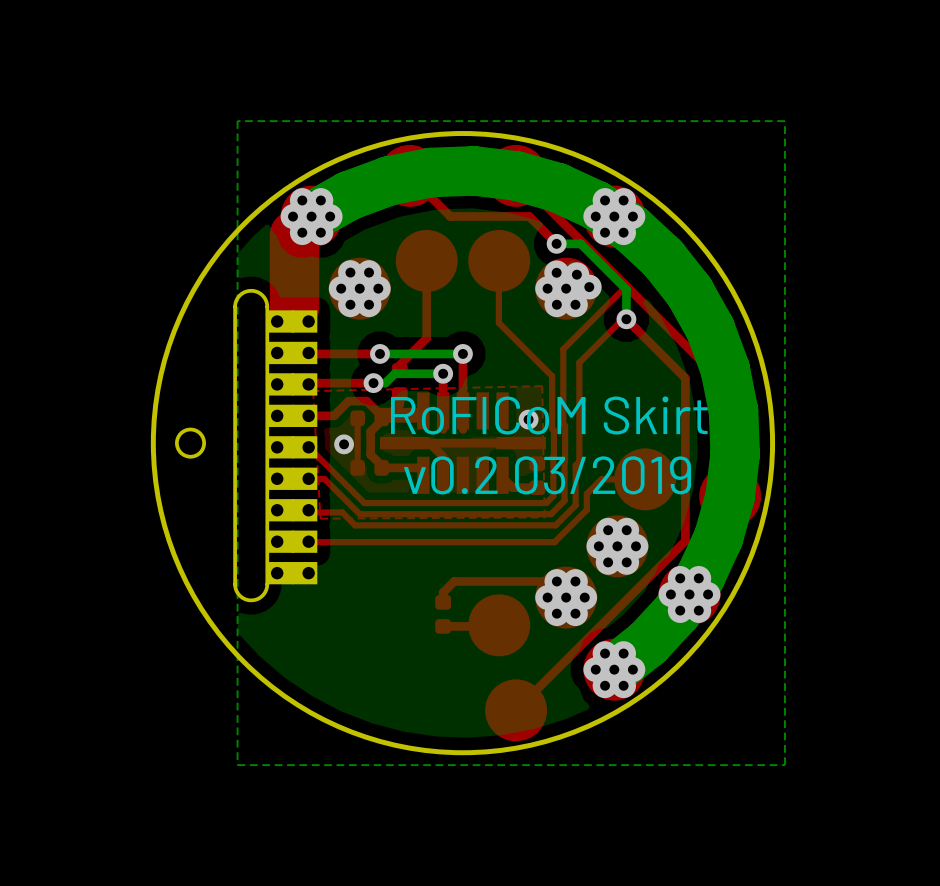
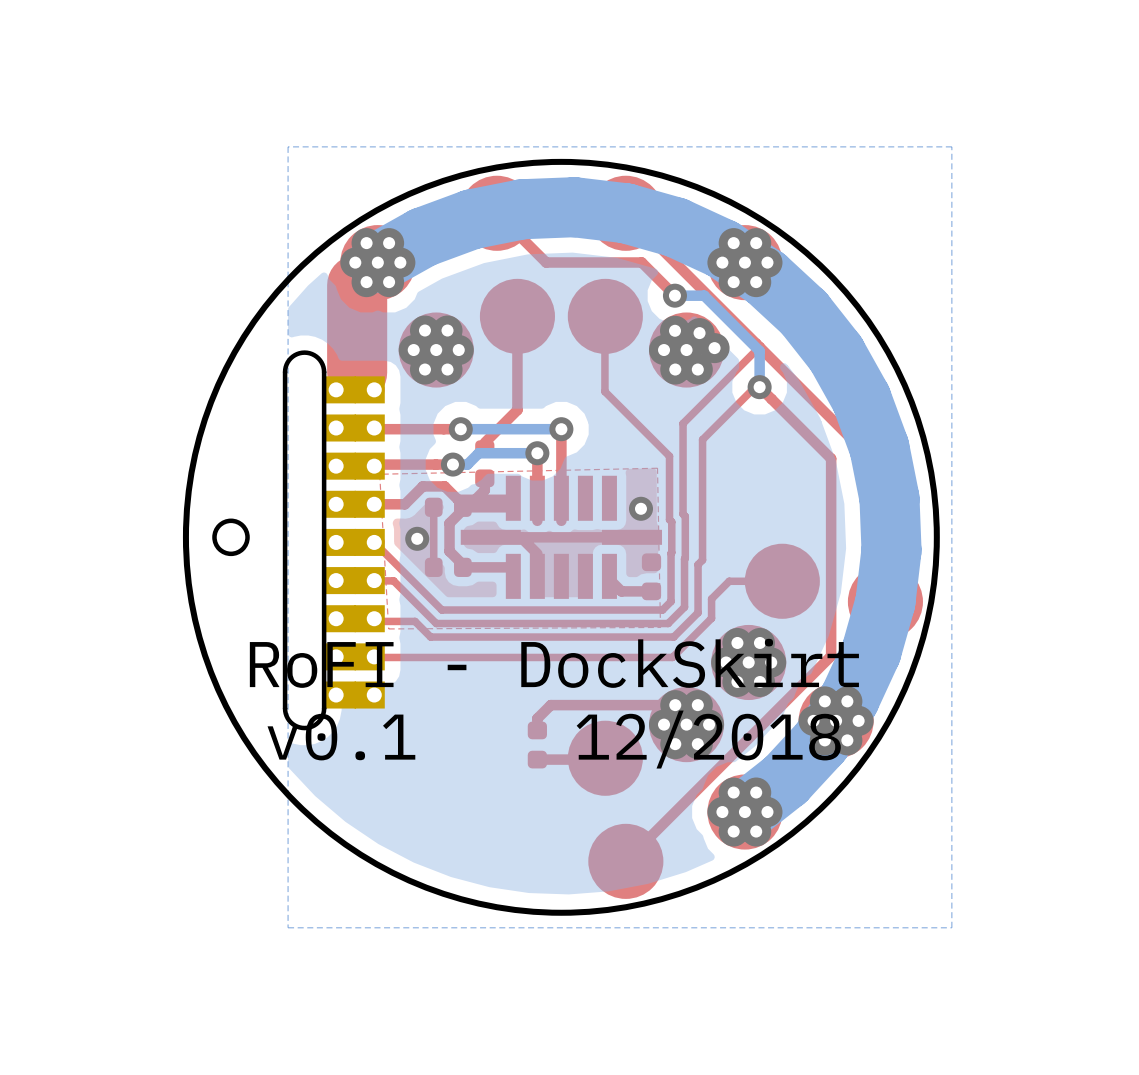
text: RoFICoM Skirt (549, 415) -> none
text: v0.2 03/2019 (547, 475) -> none
text: none -> RoFI - DockSkirt (554, 663)
text: none -> v0.1 12/2018 (554, 739)

